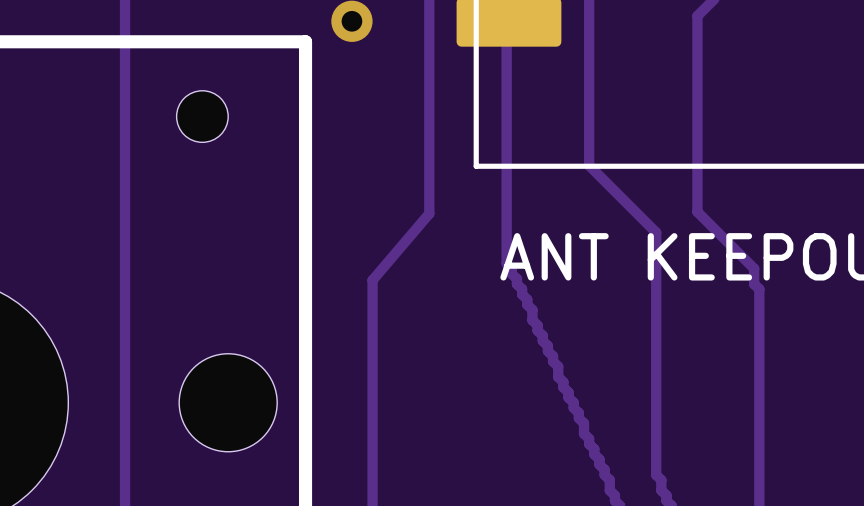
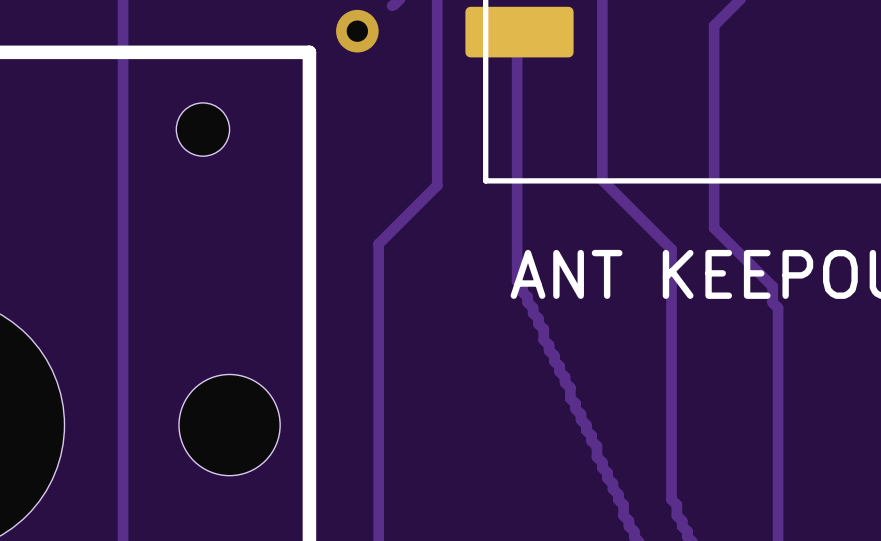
track: (429, 170) (429, 213) (372, 280) -> (437, 185) (378, 244) (378, 298)

